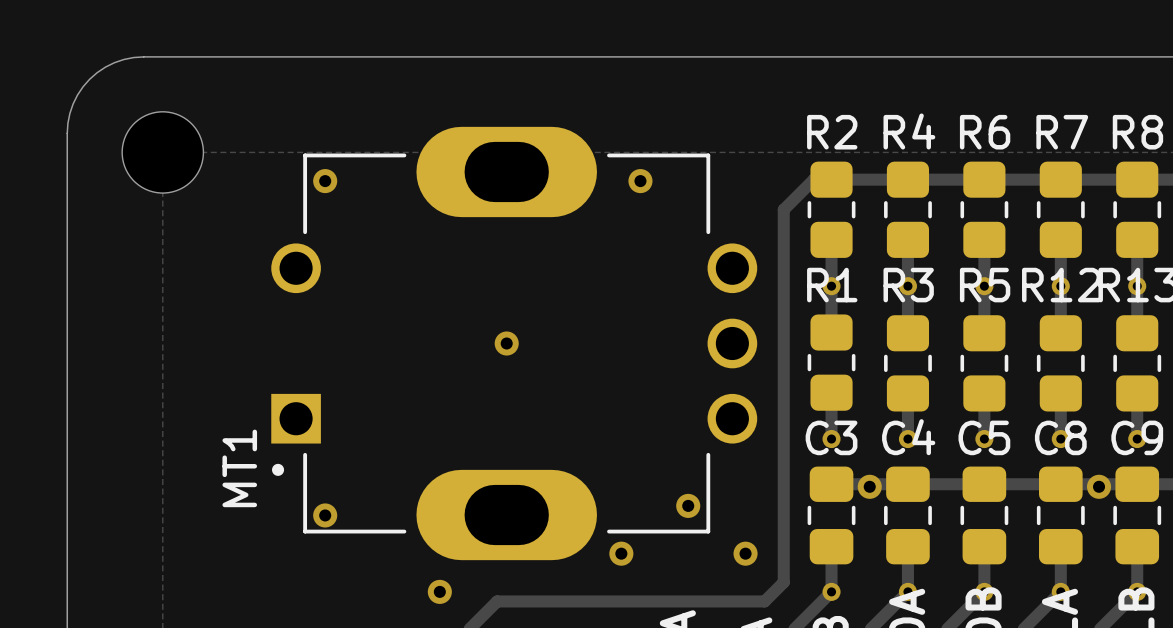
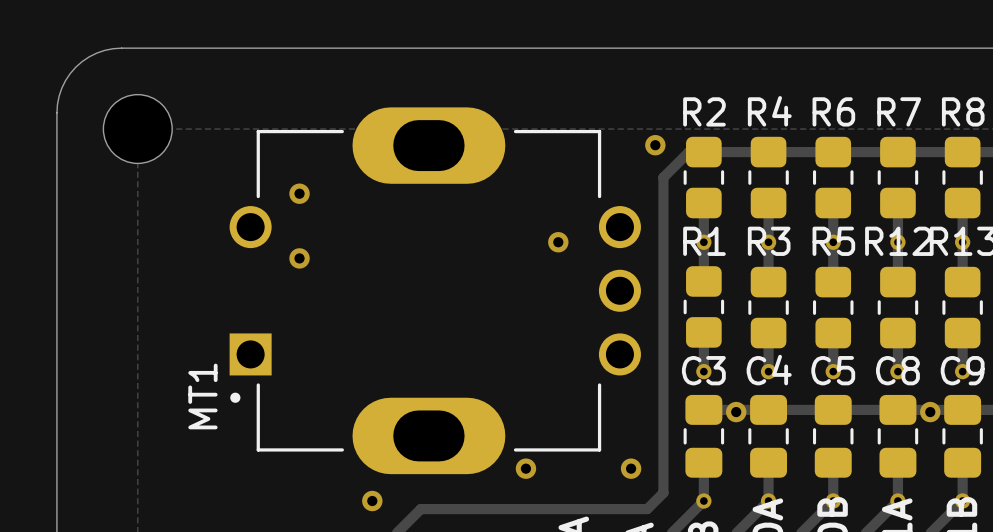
via: none -> (655, 145)
via position: (325, 181) -> (299, 193)
via: (640, 181) -> none
via: none -> (558, 242)
via: none -> (299, 258)
via: (506, 343) -> none
via: (688, 505) -> none
via: (325, 515) -> none

